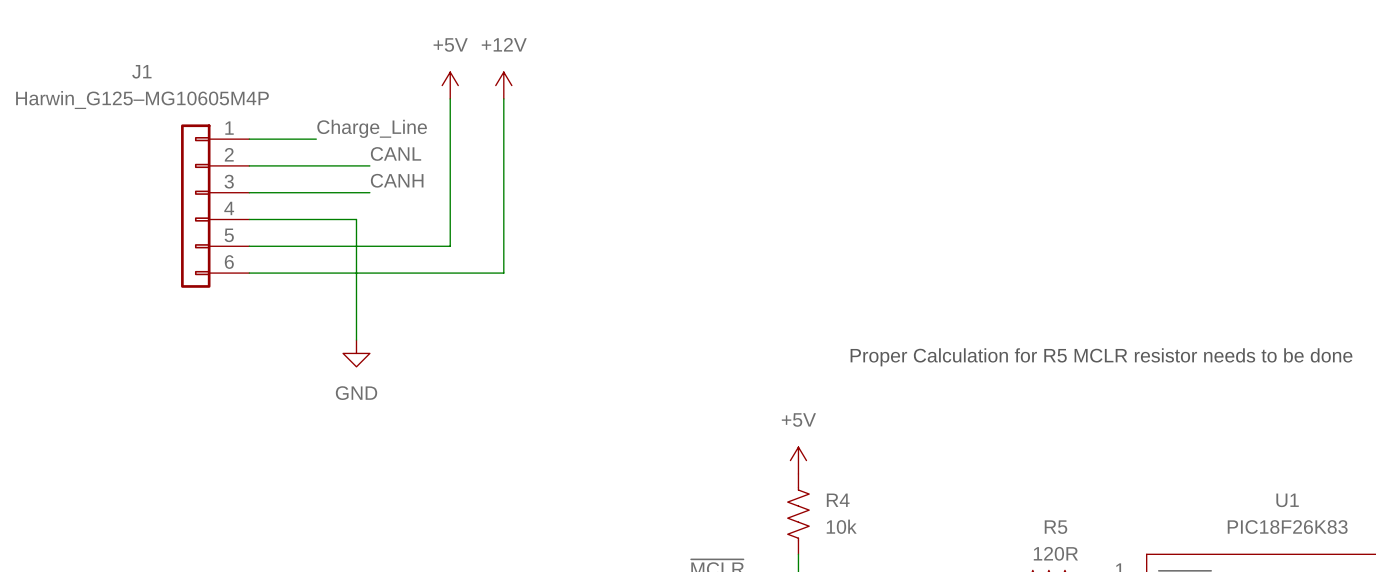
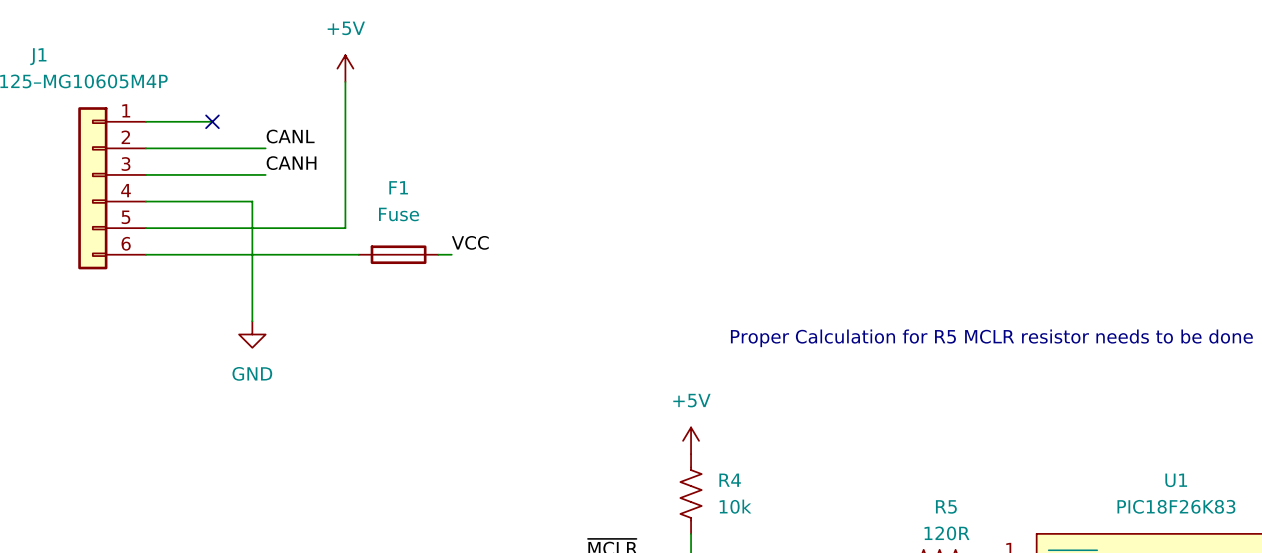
power symbol: +12V (503, 85) -> none
wire: (503, 98) (503, 273) (463, 273) -> none
label: Charge_Line (372, 128) -> none
no-connect mark: none -> (212, 121)
label: none -> VCC (470, 242)
F1: none -> Fuse (398, 254)
wire: none -> (438, 254) (451, 254)

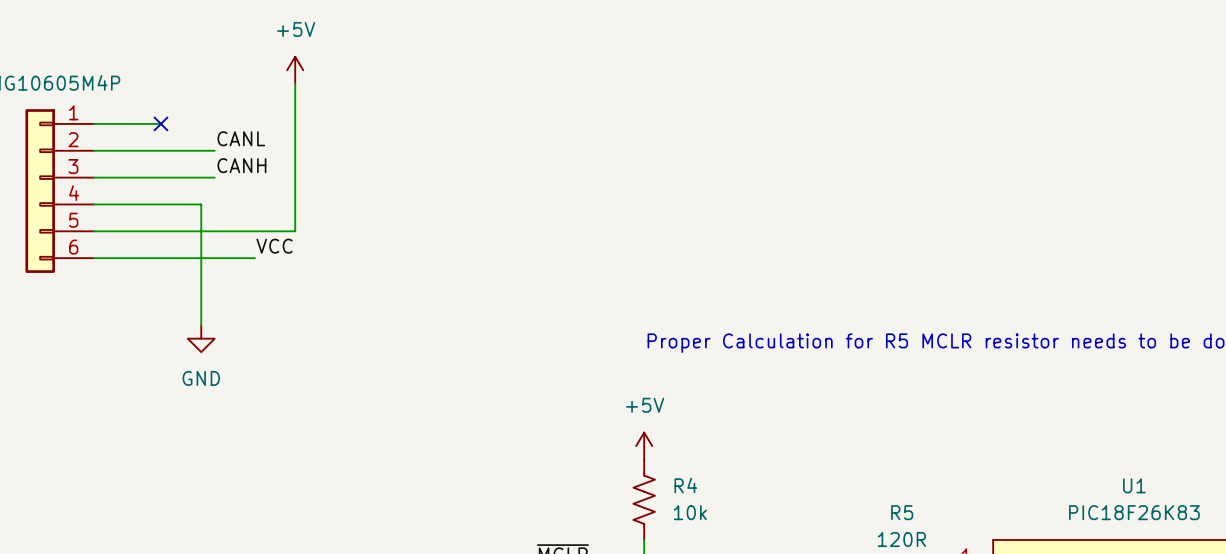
label position: VCC (470, 242) -> VCC (274, 246)
wire: (305, 254) (358, 254) -> none
F1: Fuse (398, 254) -> none
wire: (438, 254) (451, 254) -> none

